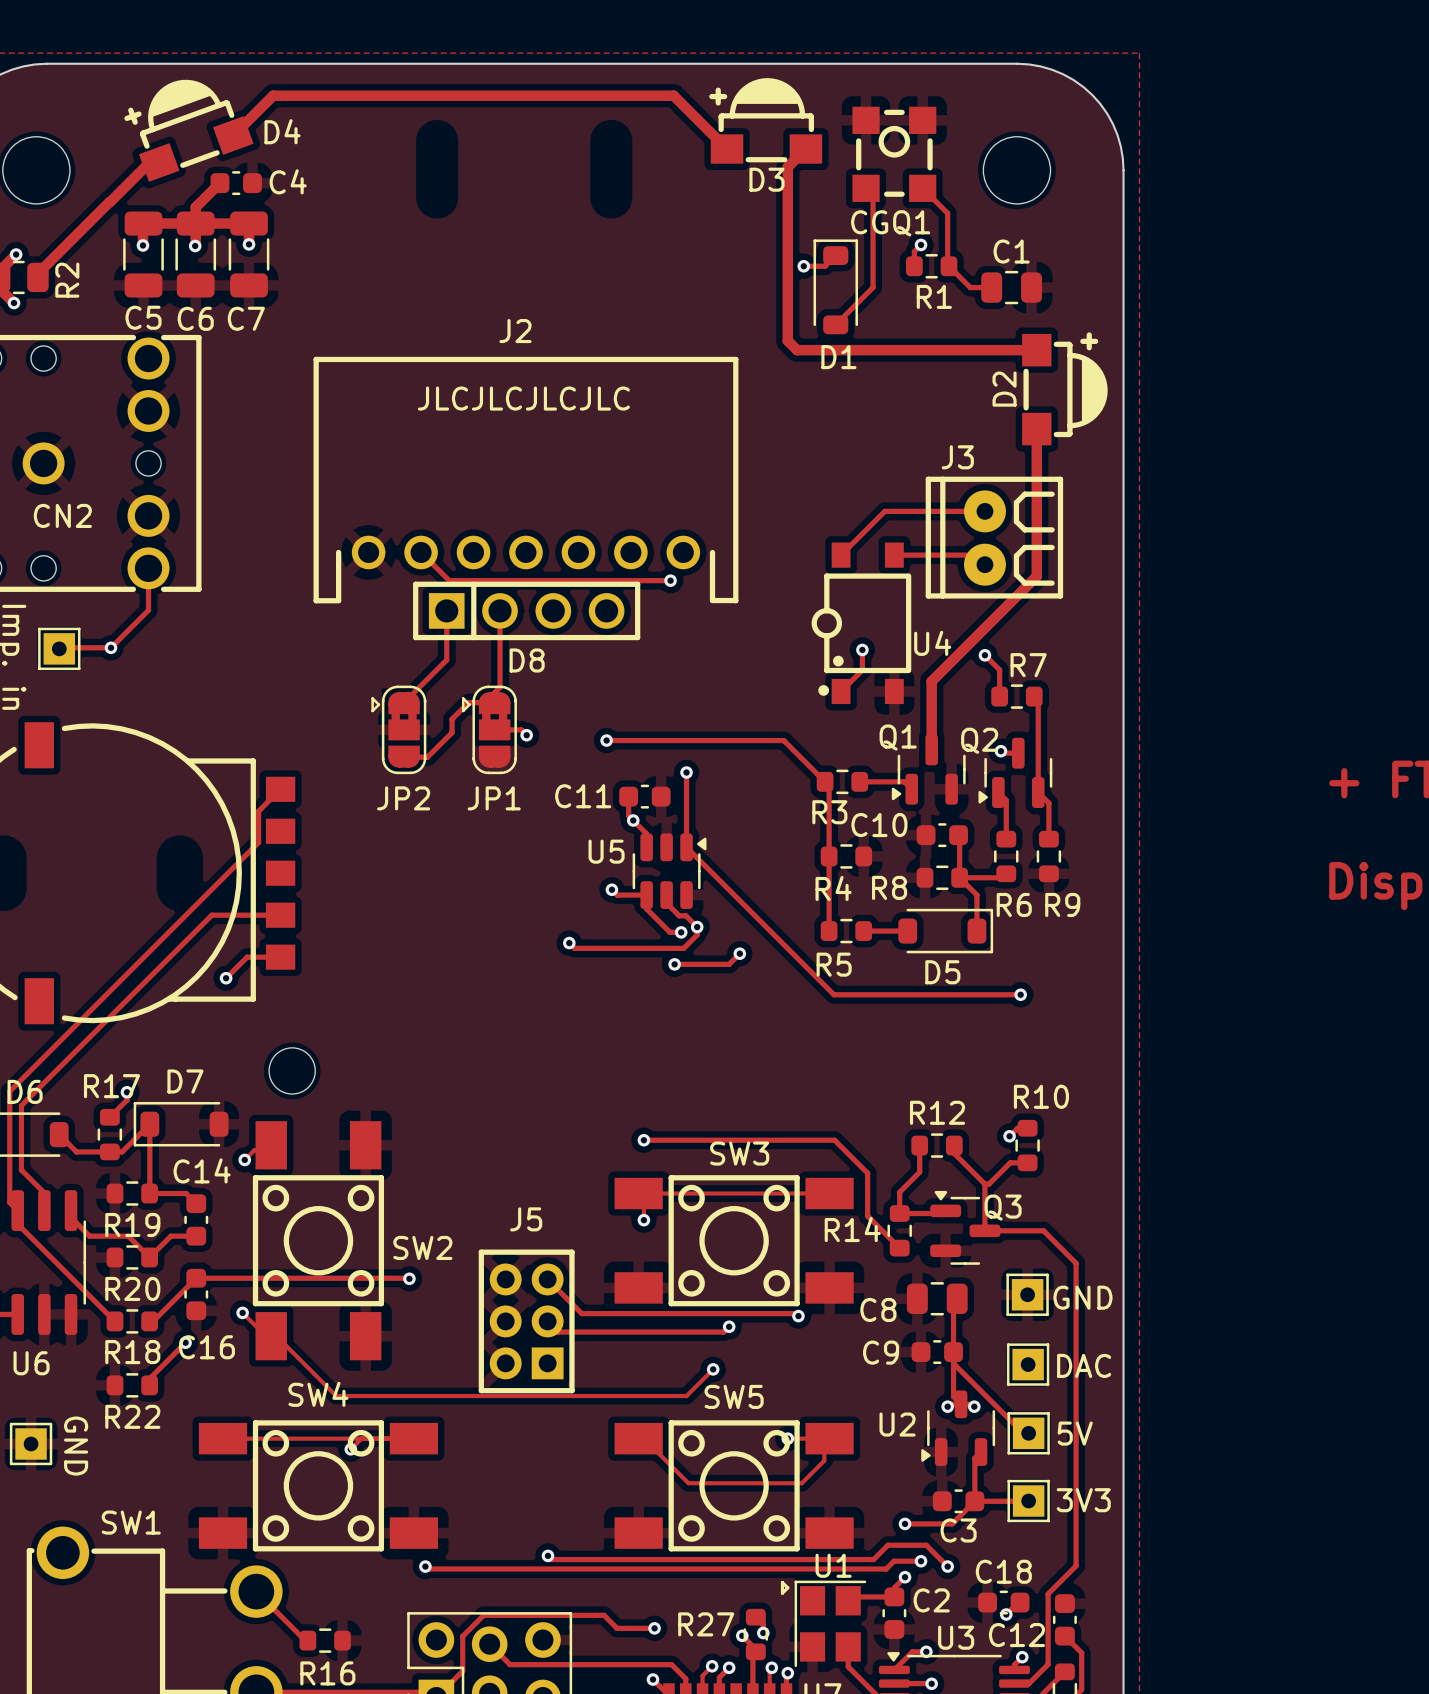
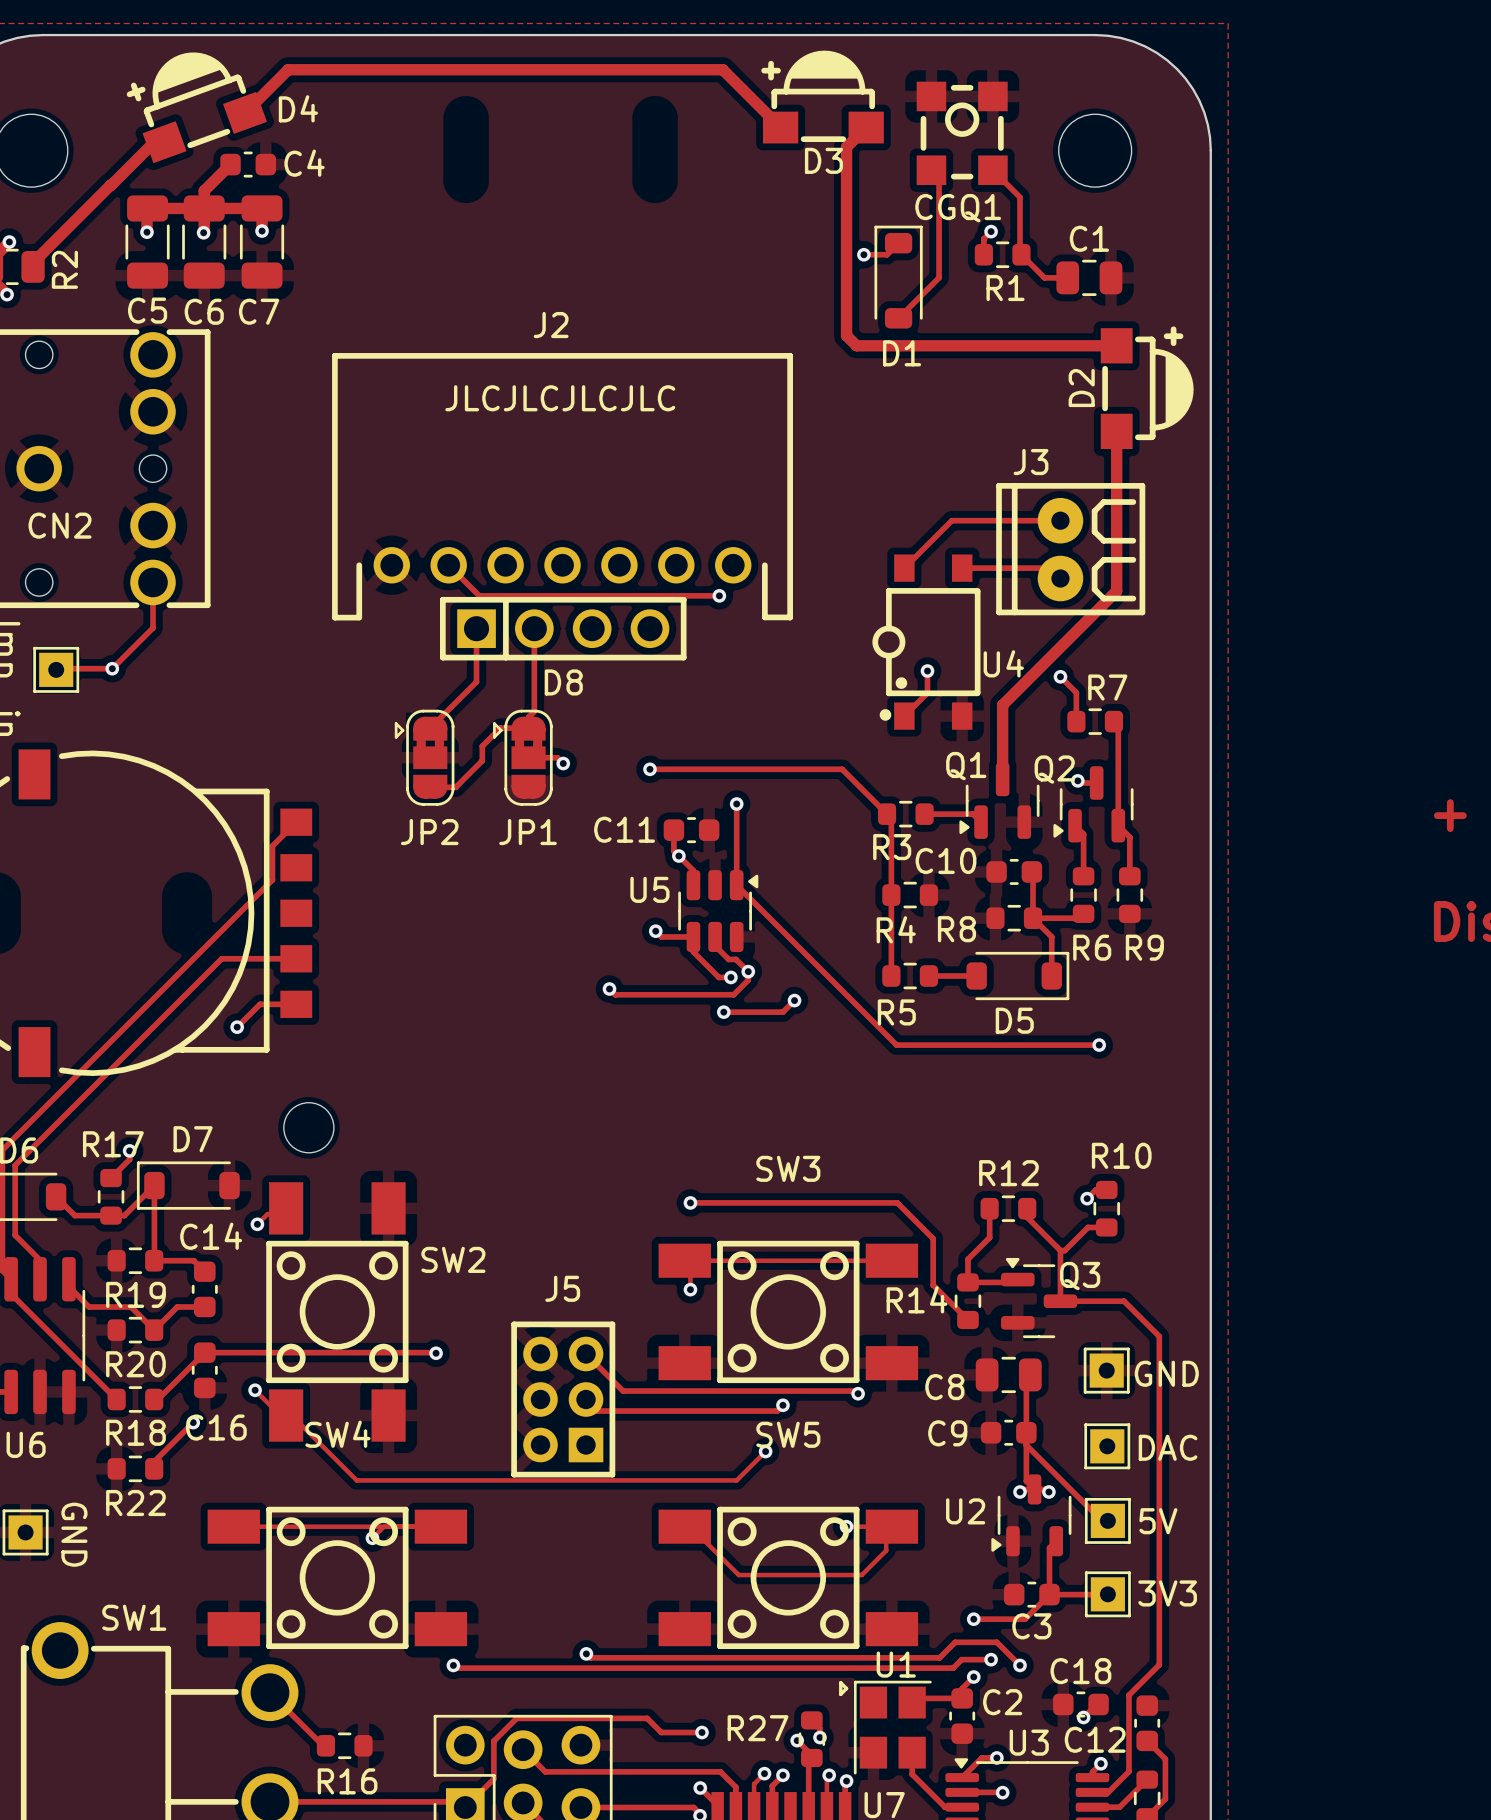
SW3 name position: SW3 (739, 1153) -> SW3 (788, 1168)
SW2 name position: SW2 (422, 1247) -> SW2 (453, 1259)
SW4 name position: SW4 (318, 1394) -> SW4 (337, 1434)
SW5 name position: SW5 (734, 1396) -> SW5 (788, 1434)

